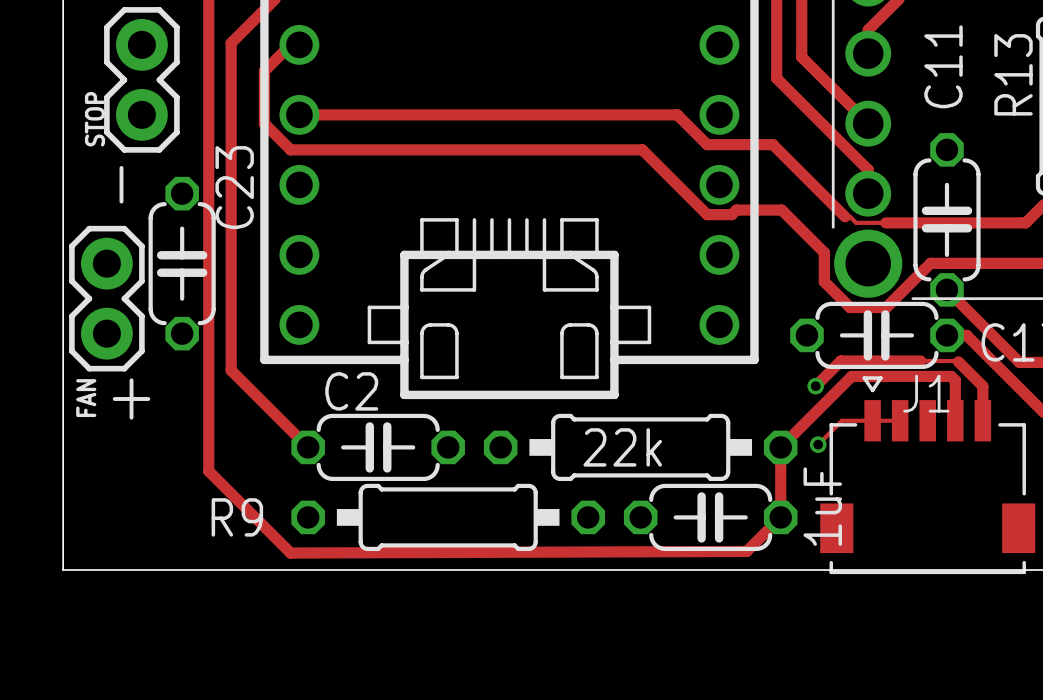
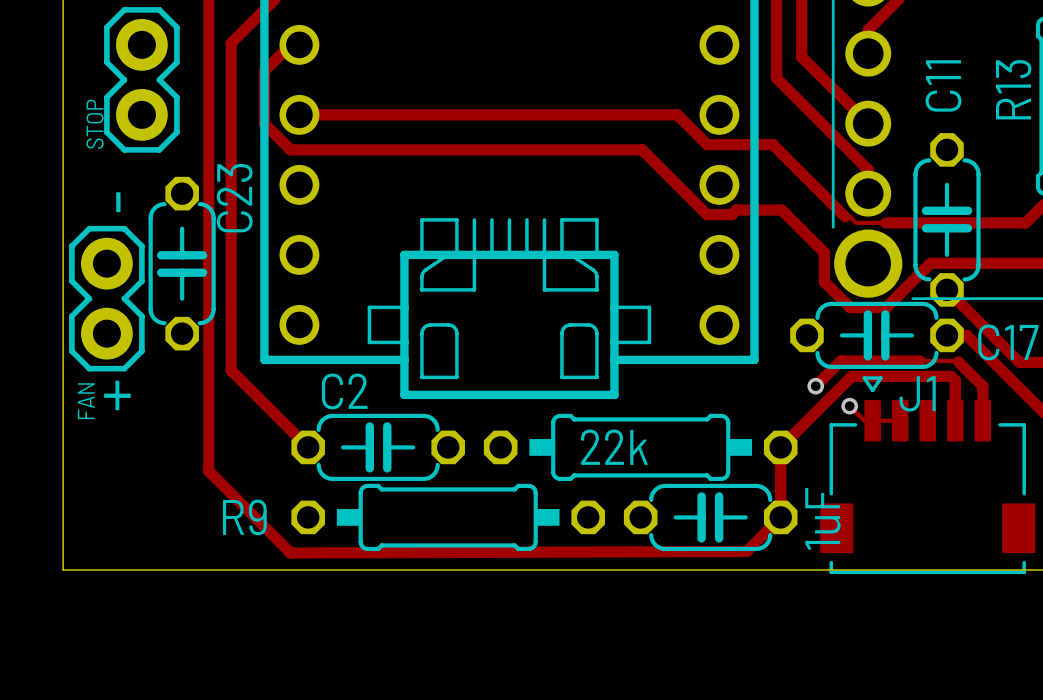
track: (864, 420) (842, 420) (818, 444) -> (864, 420) (849, 406)
via position: (818, 444) -> (849, 406)

